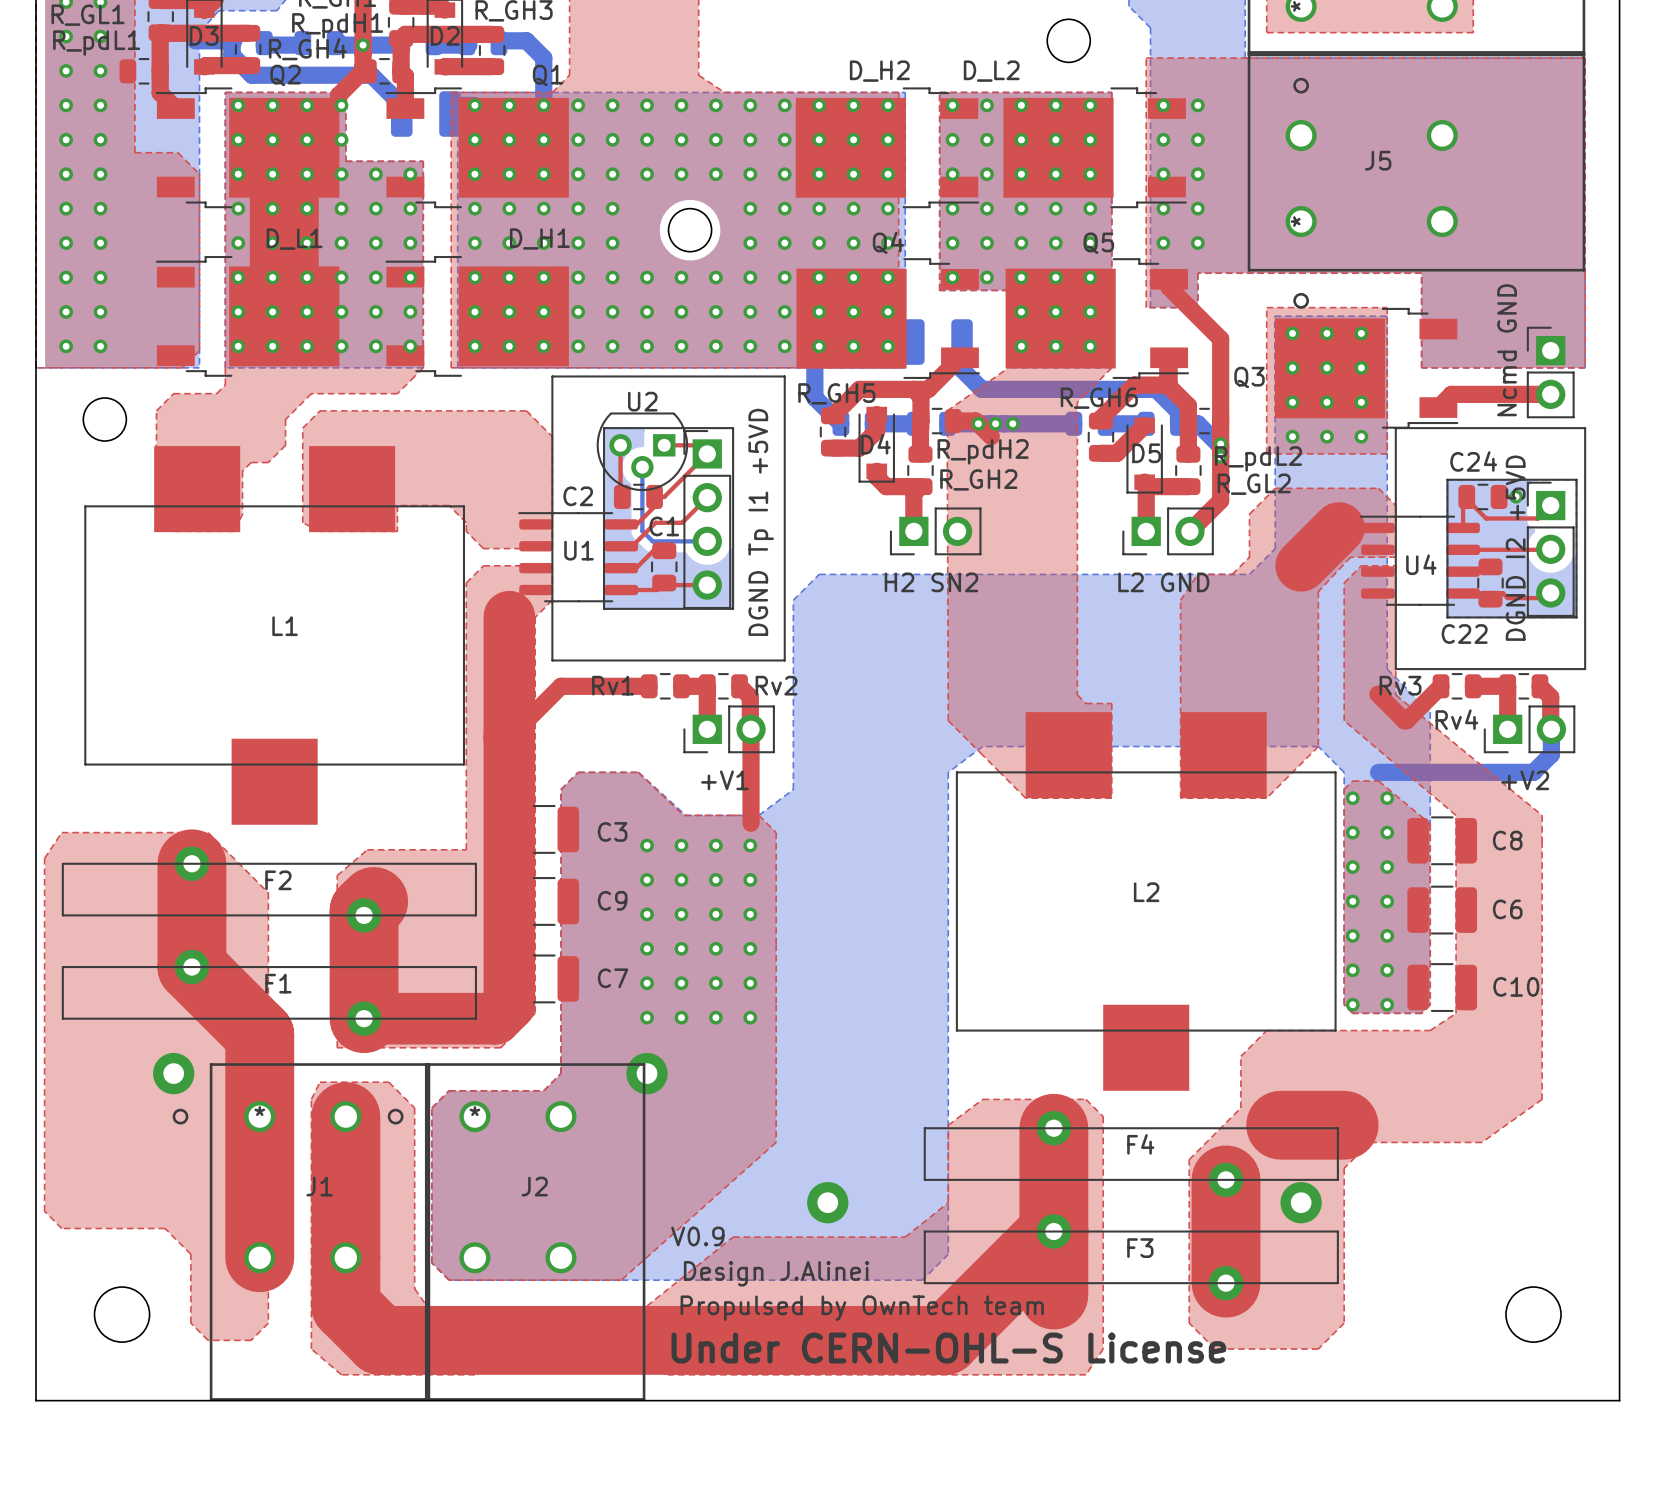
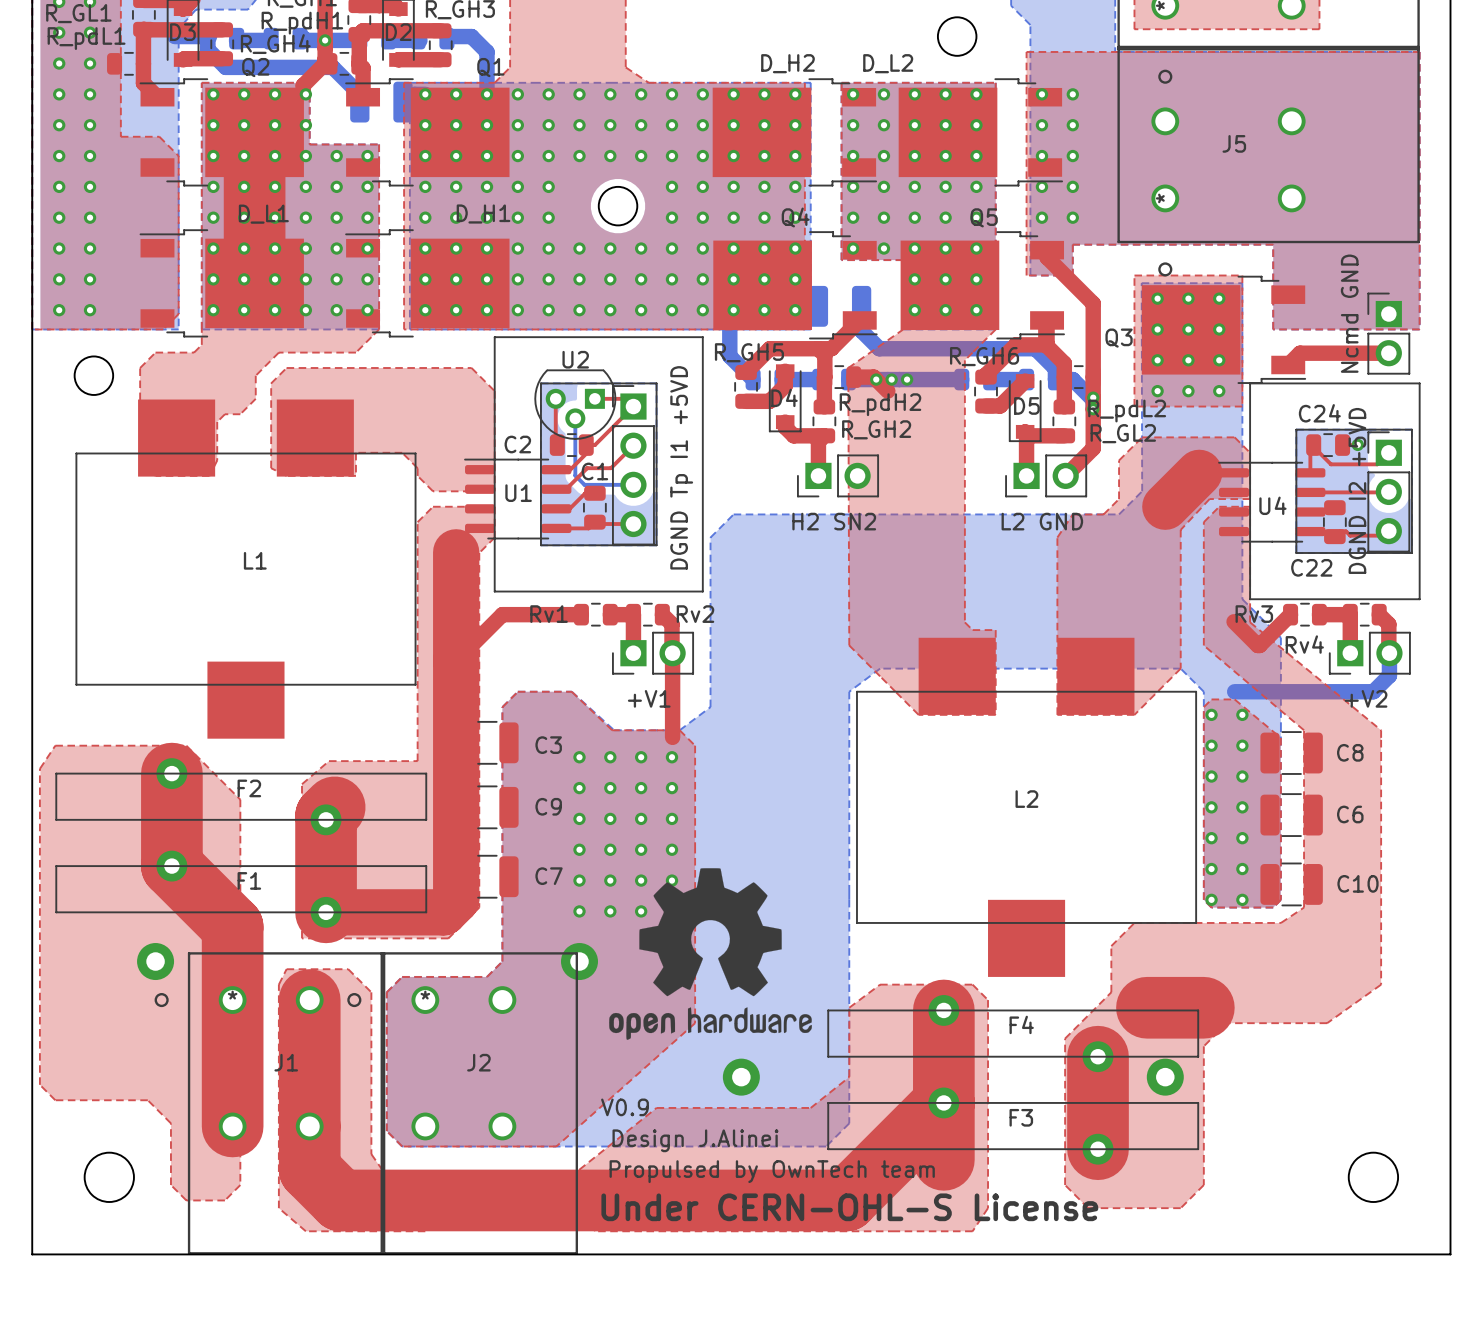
drawing: none -> [609, 868, 812, 1040]

